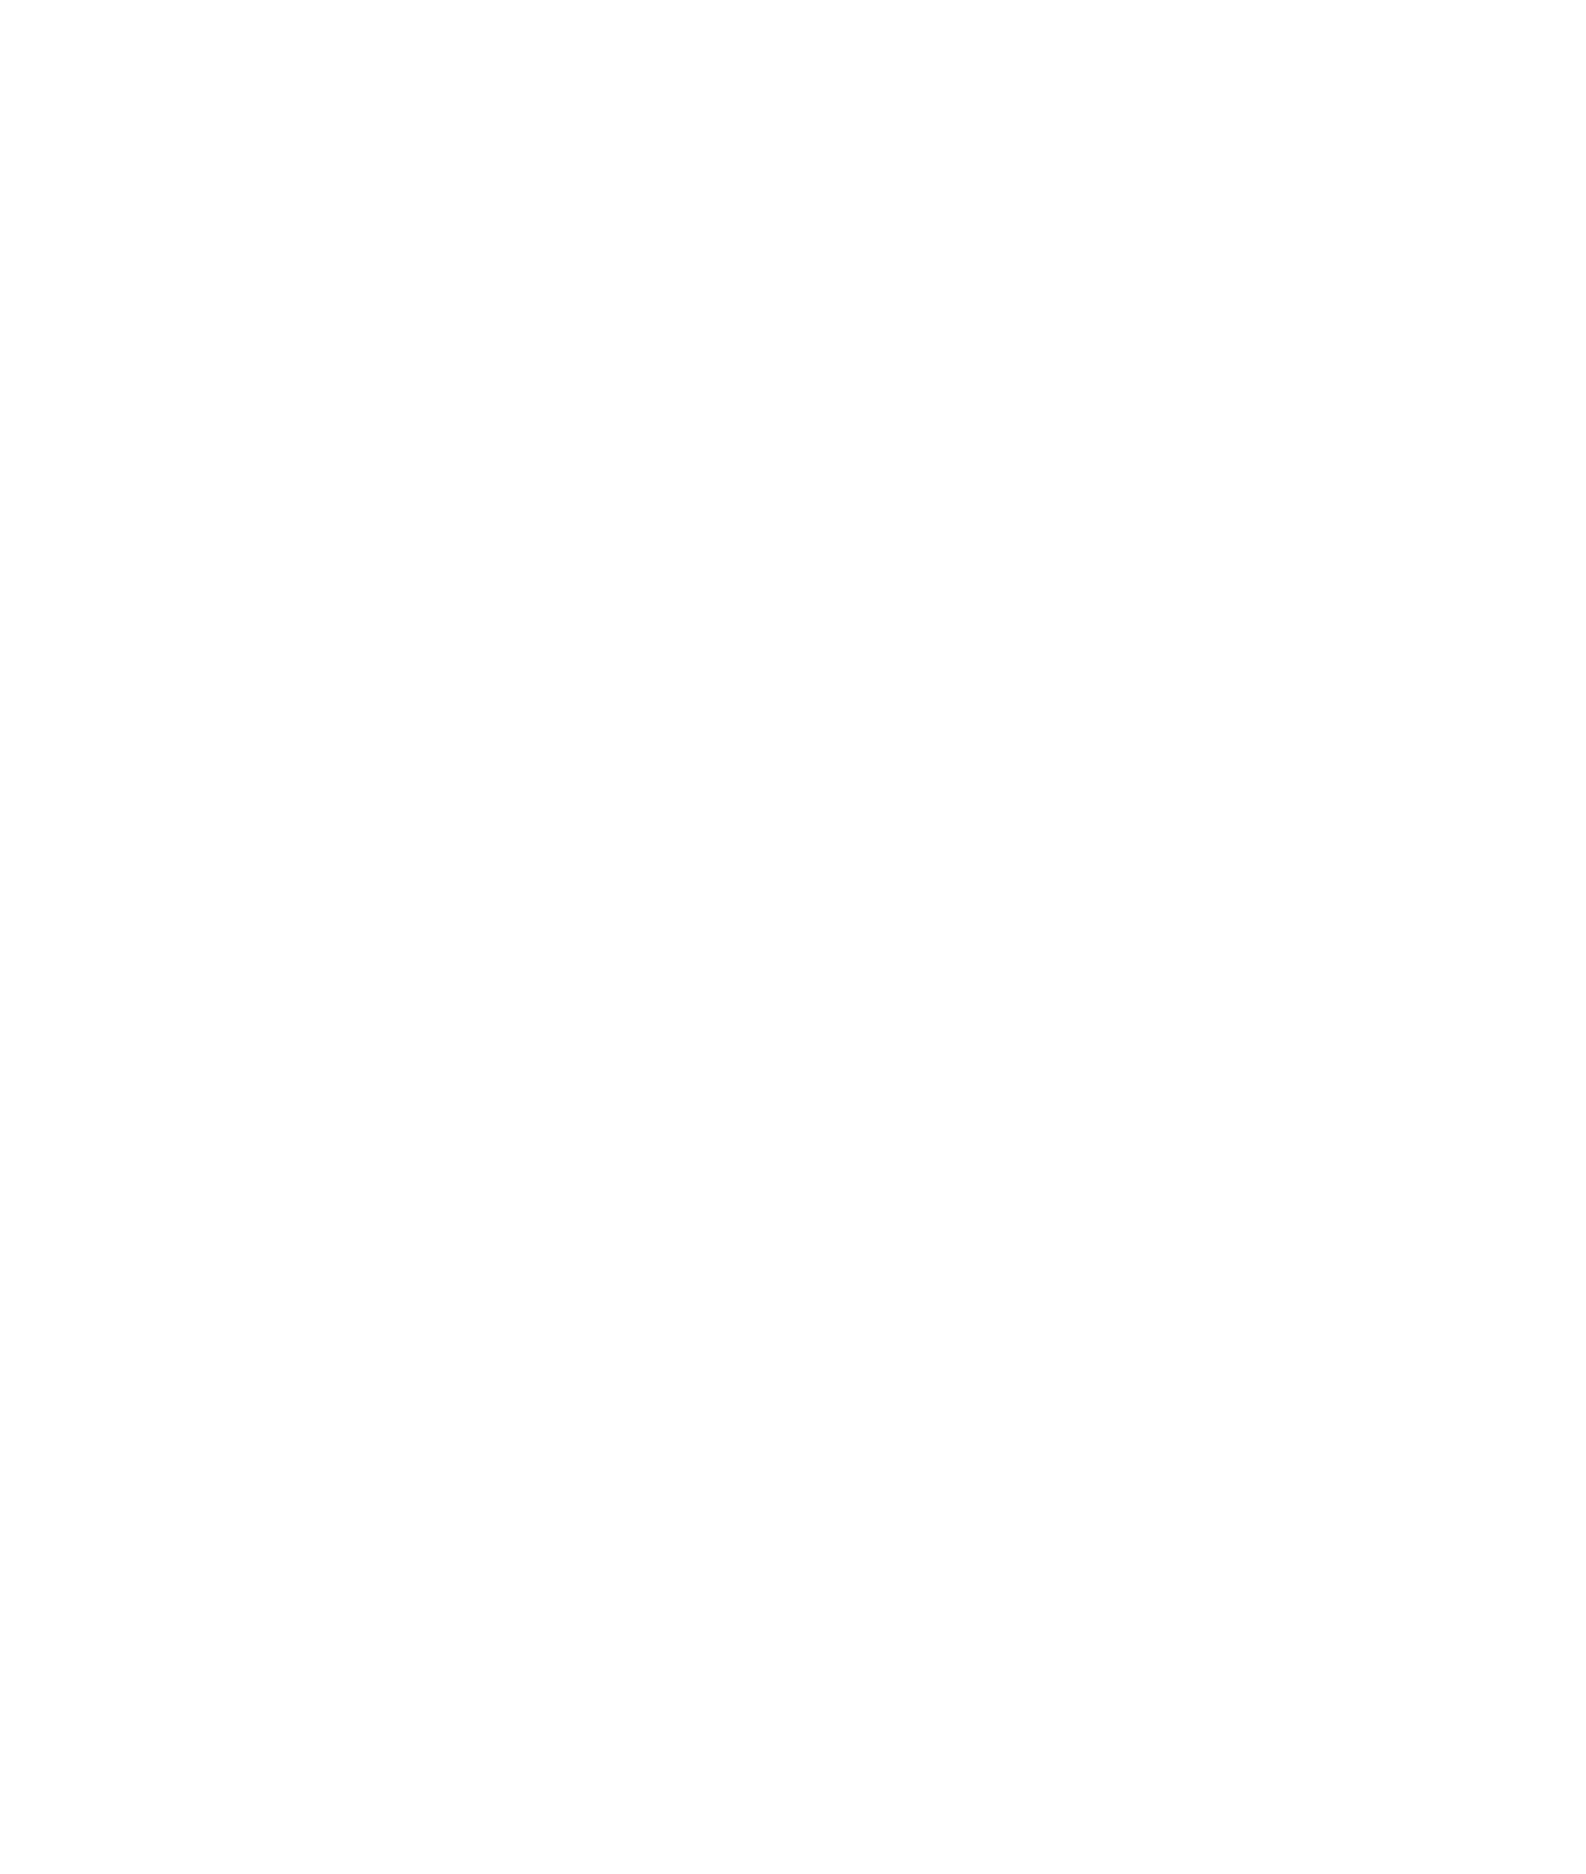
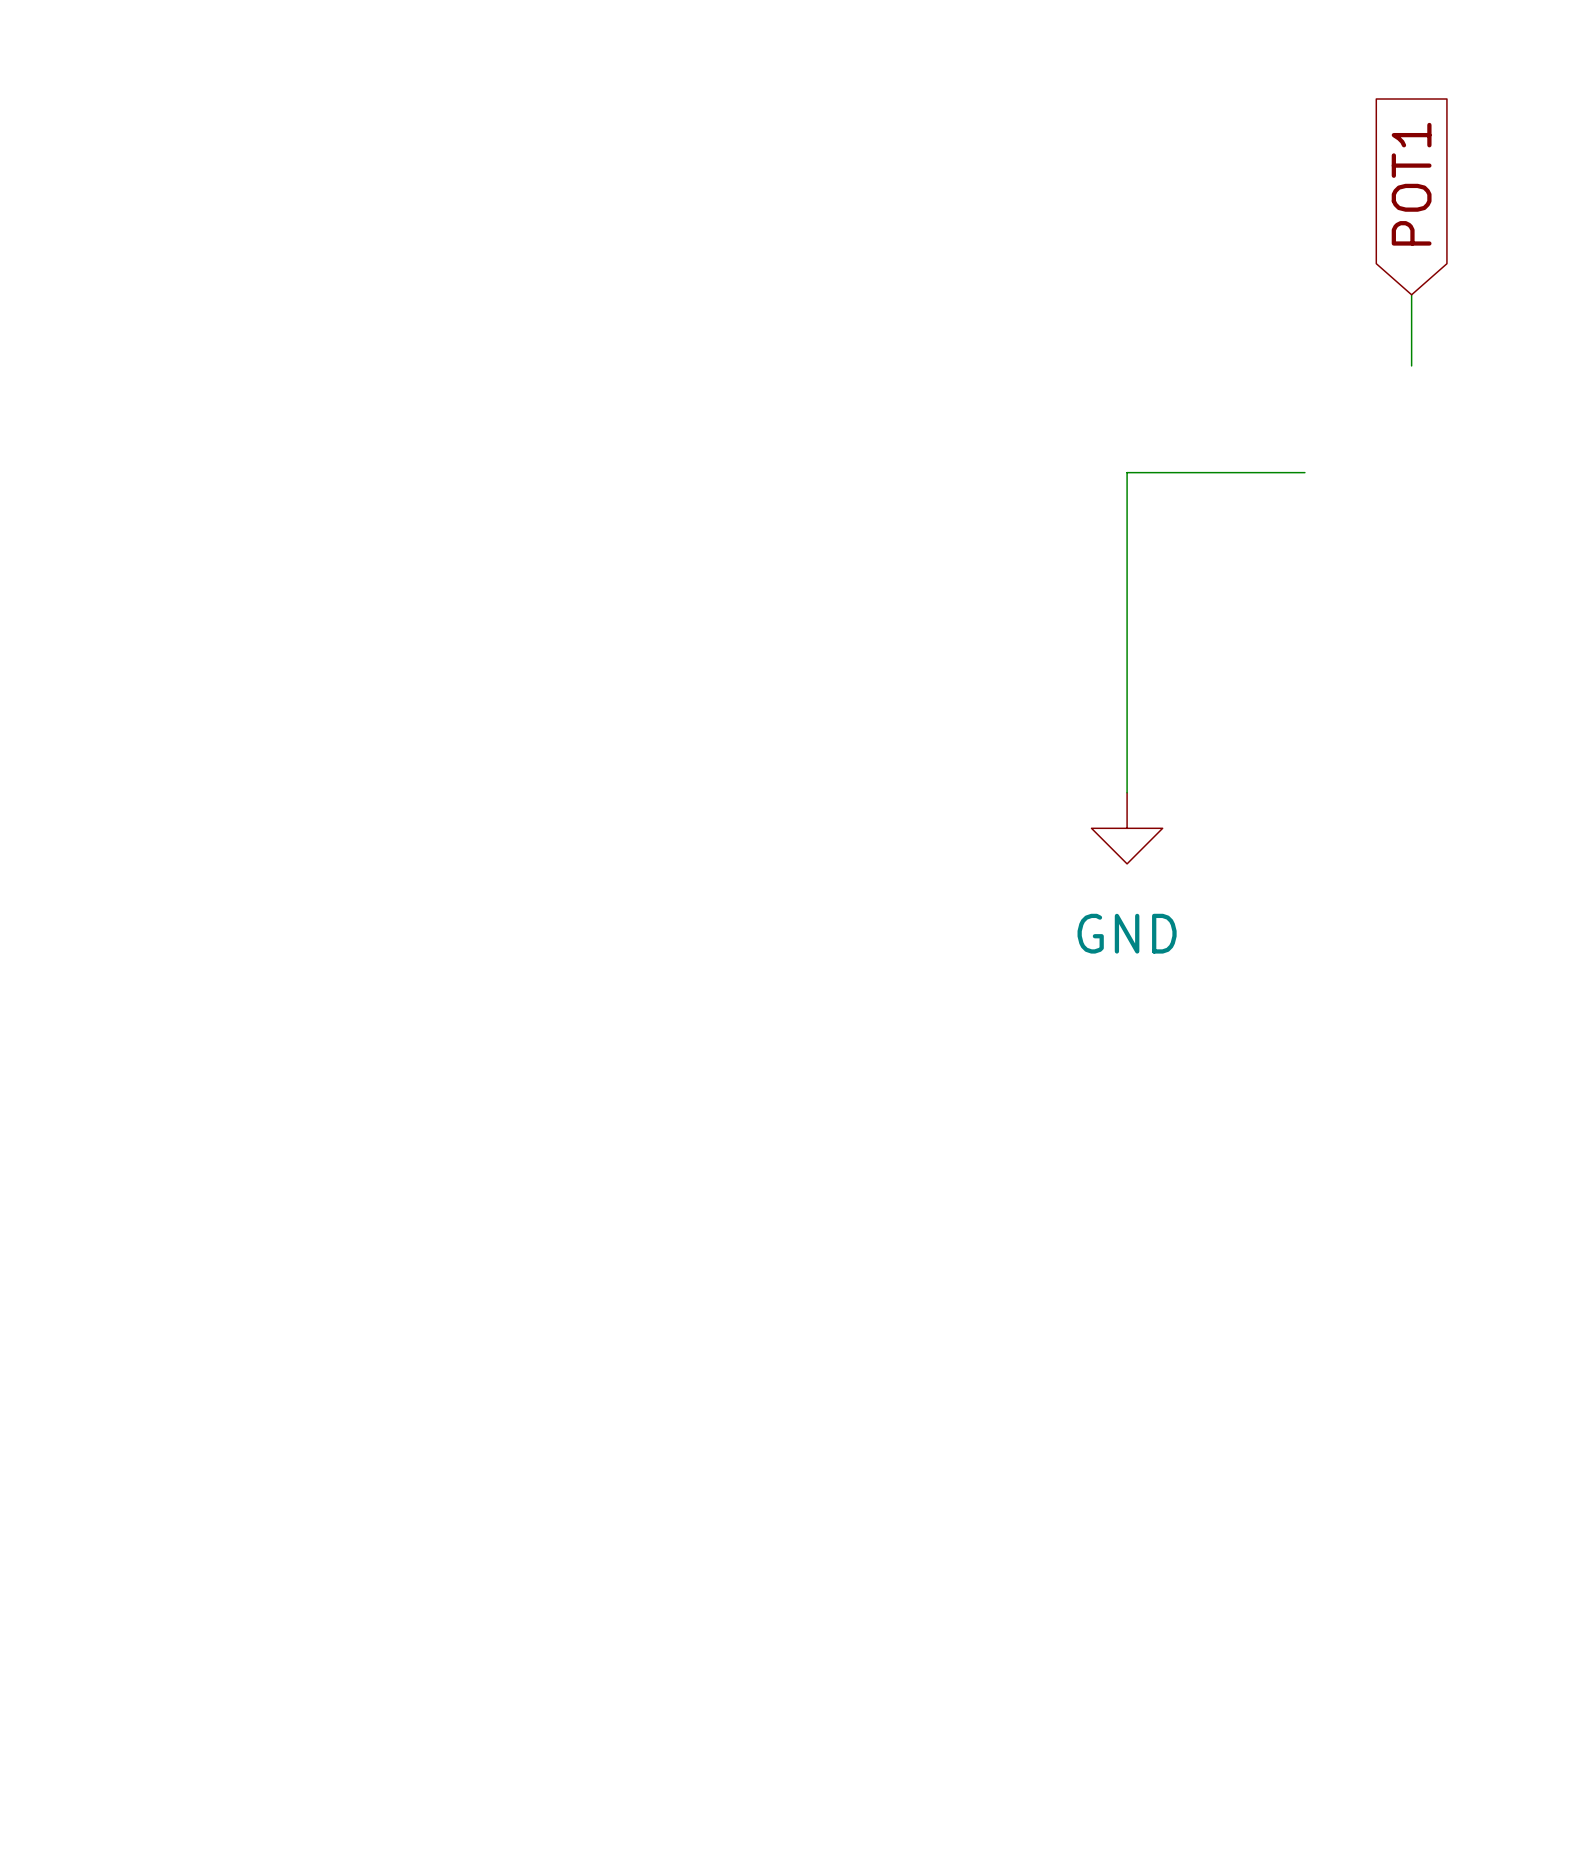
global label: none -> POT1 (1411, 184)
wire: none -> (1411, 294) (1411, 365)
wire: none -> (1304, 472) (1127, 472) (1127, 792)
power symbol: none -> GND (1127, 828)

